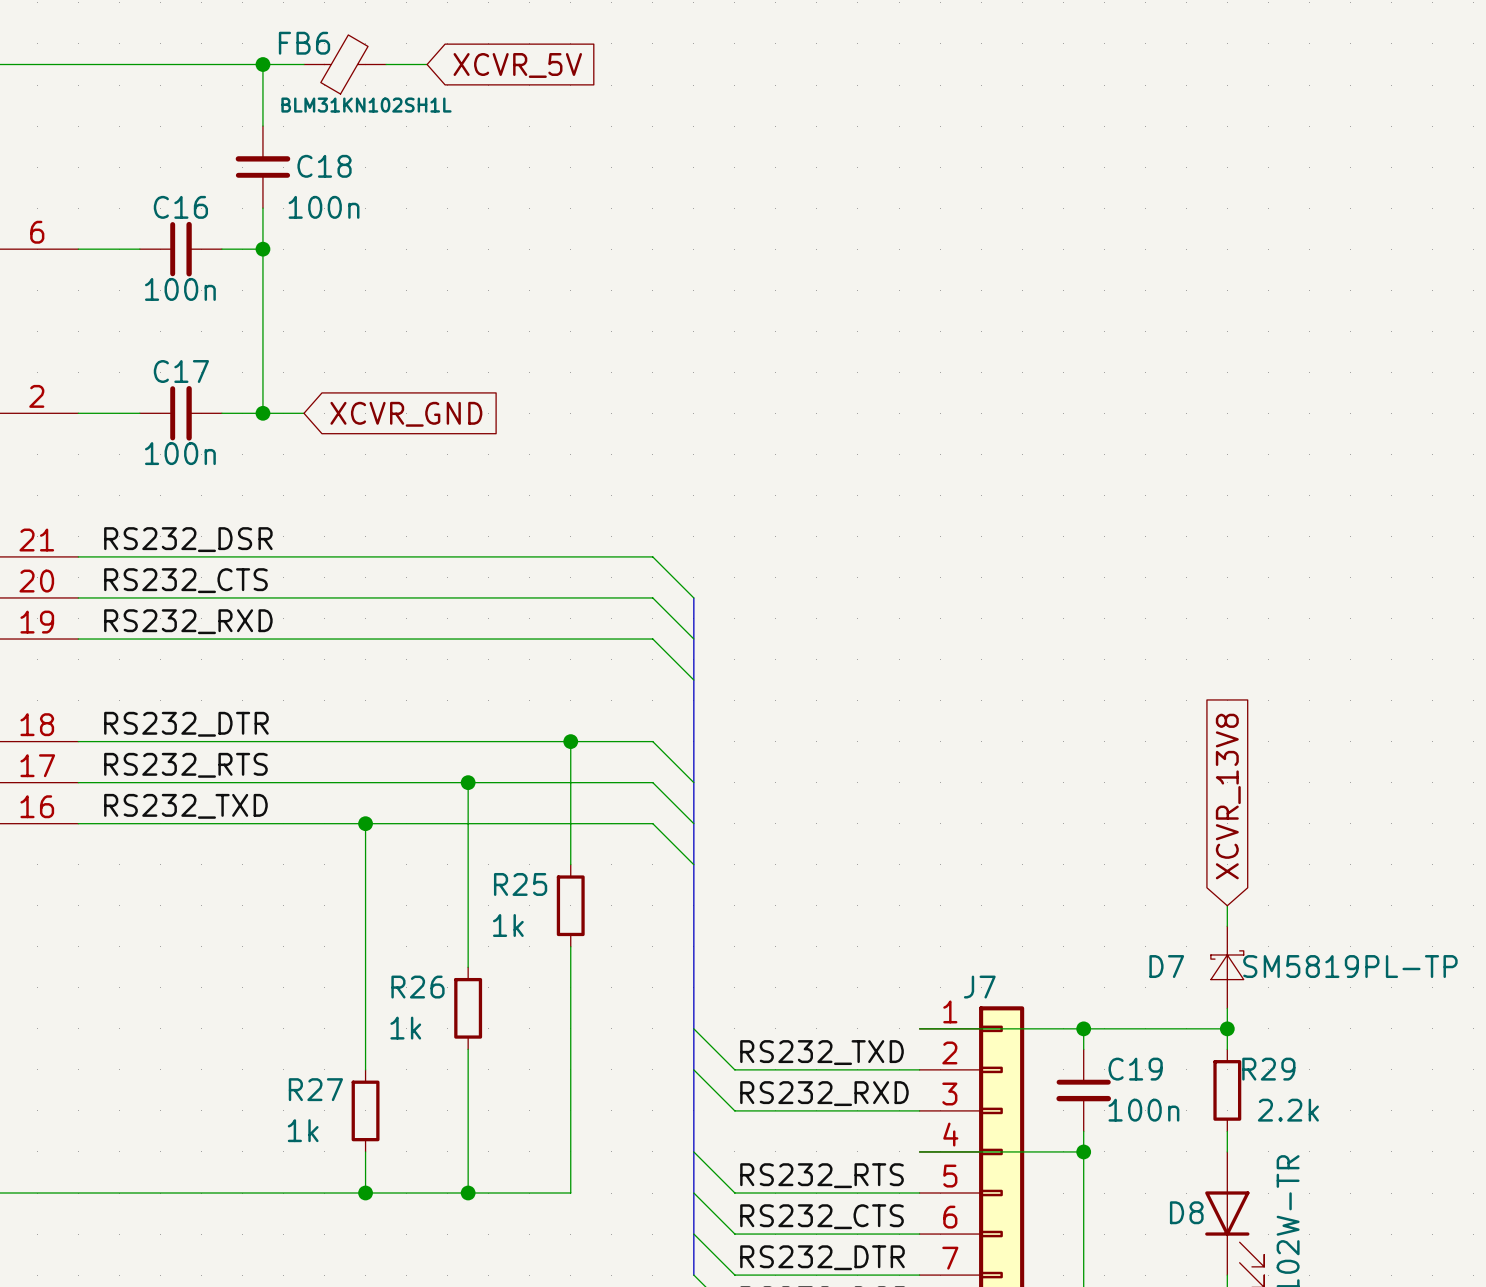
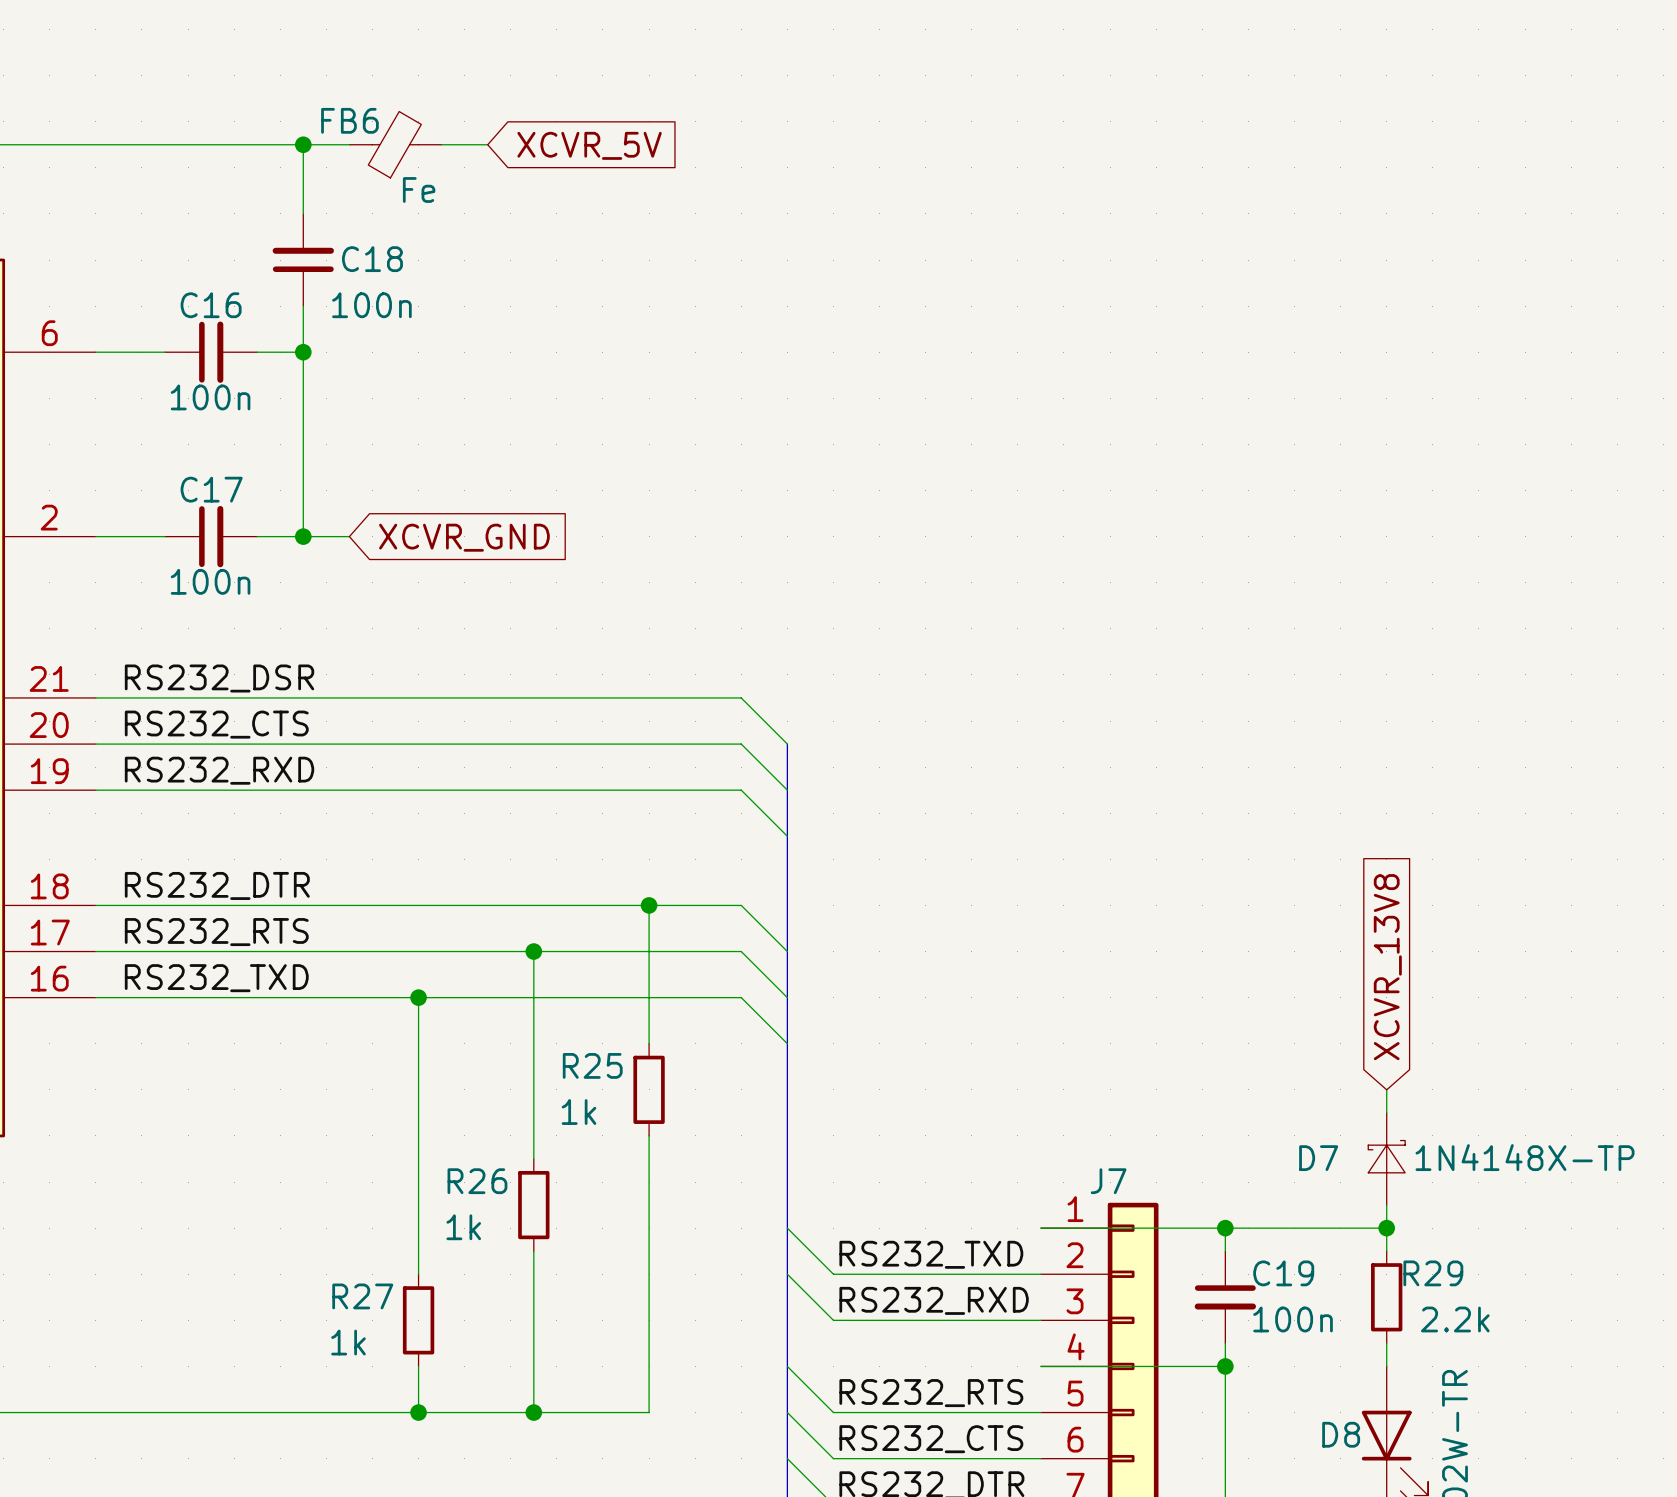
FB6 value: BLM31KN102SH1L (366, 105) -> Fe (419, 189)
D7 value: SM5819PL-TP (1350, 966) -> 1N4148X-TP (1525, 1157)

